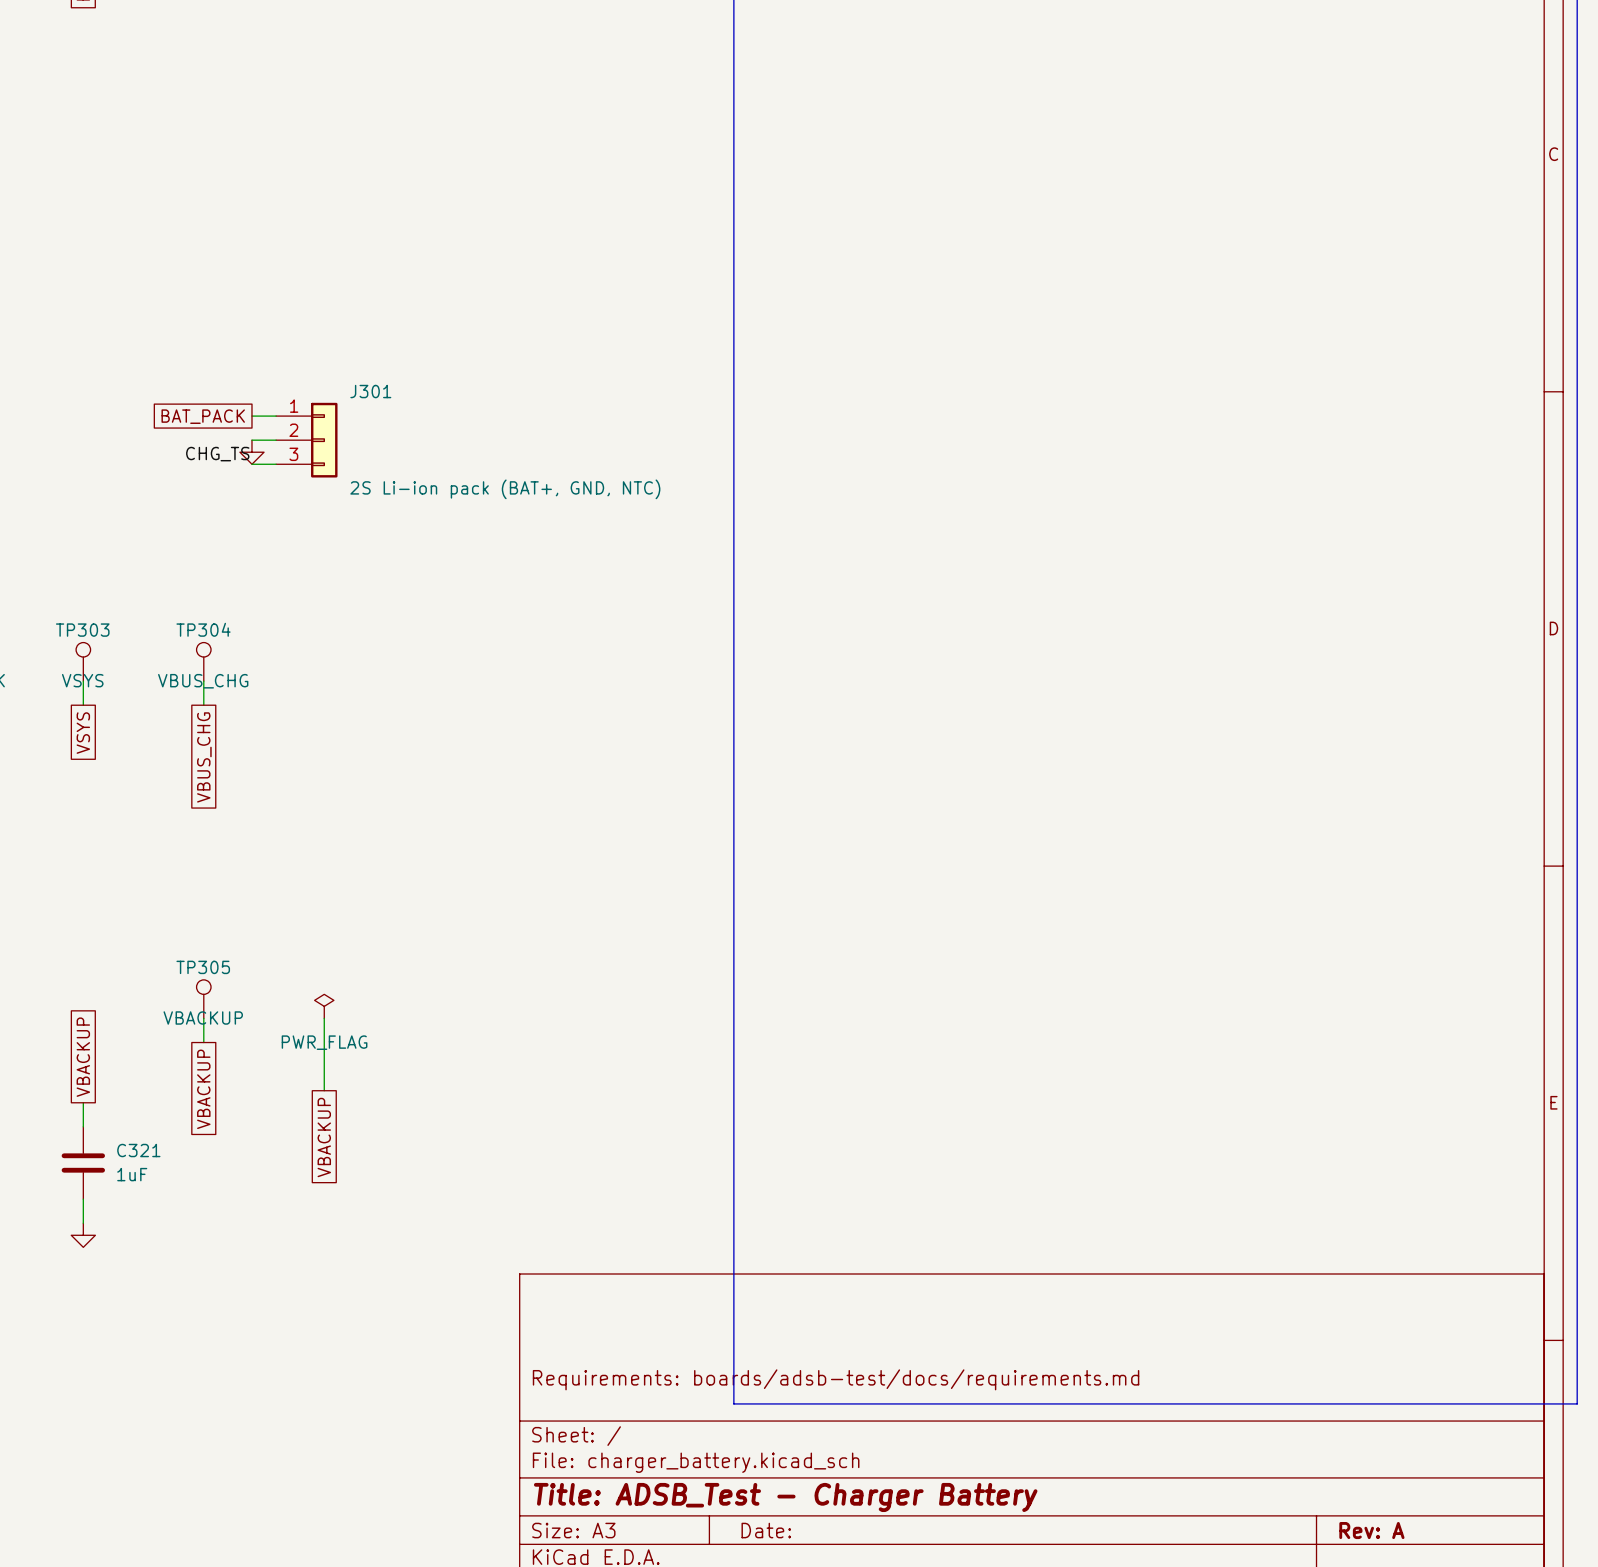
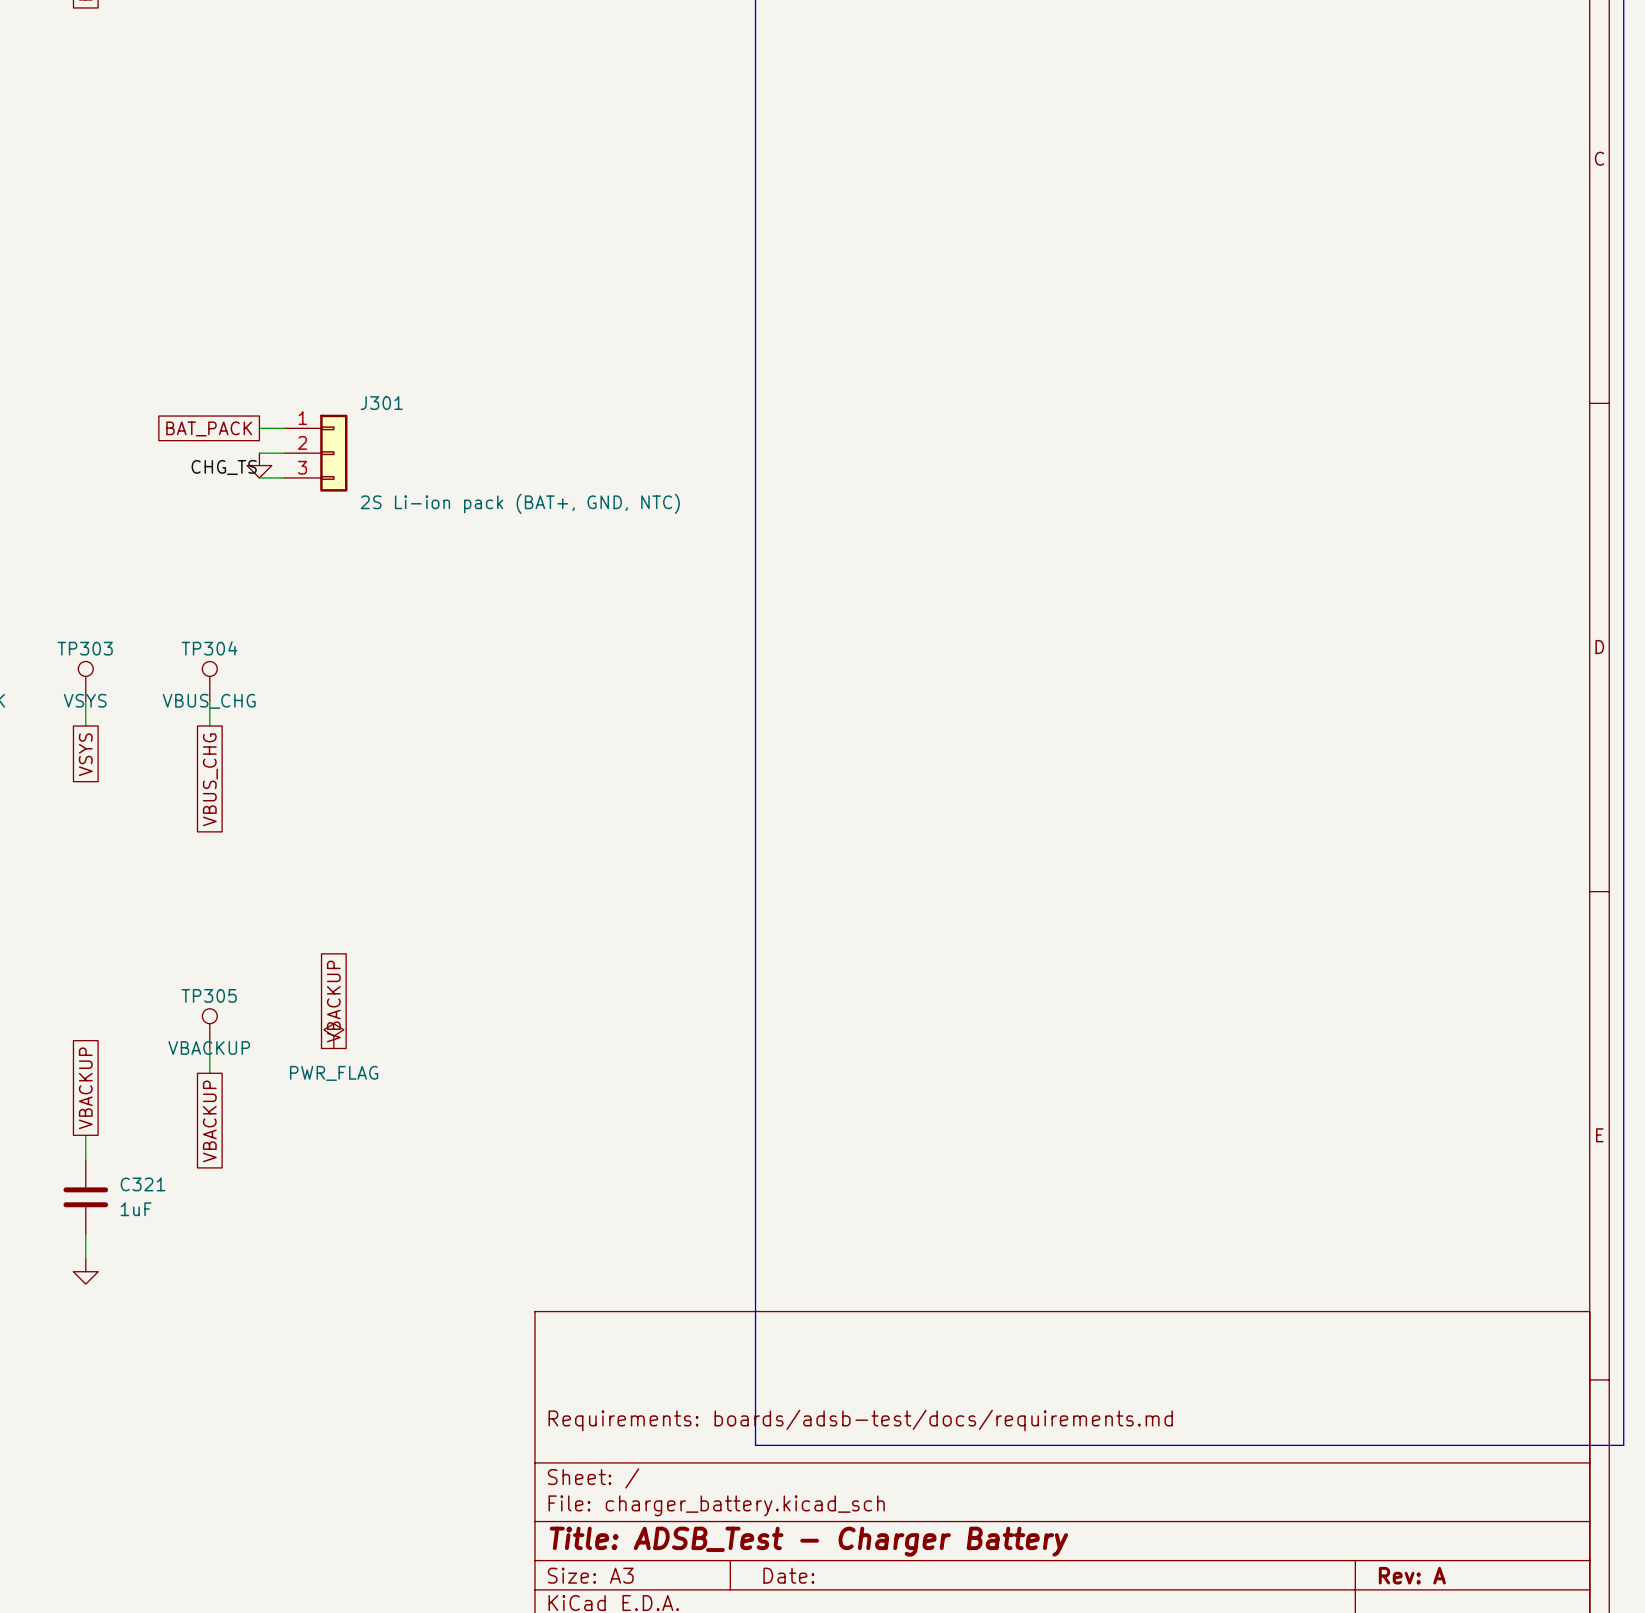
wire: (324, 1018) (324, 1090) -> none
global label rotation: 0° (324, 1137) -> 180° (333, 1001)
global label position: VBACKUP (324, 1137) -> VBACKUP (333, 1001)

